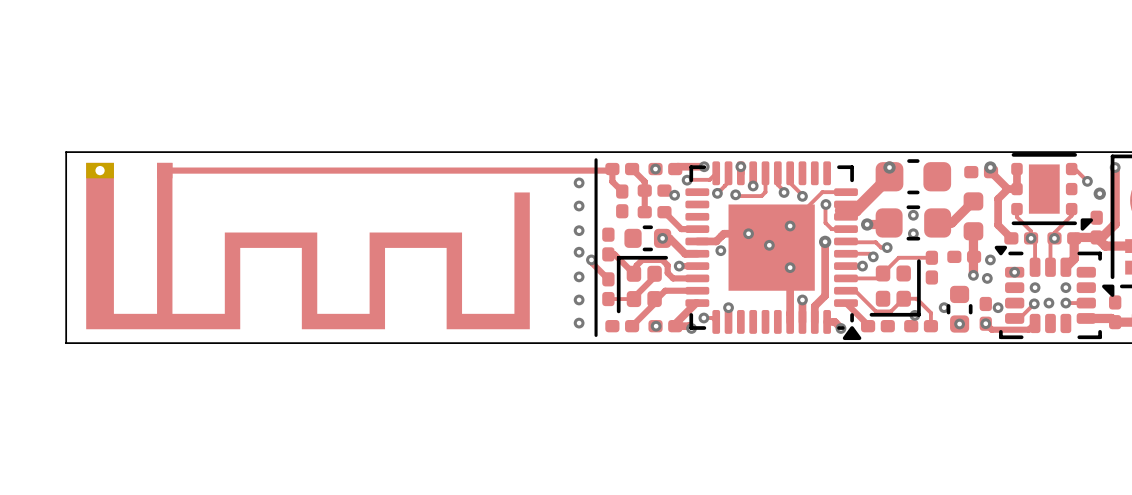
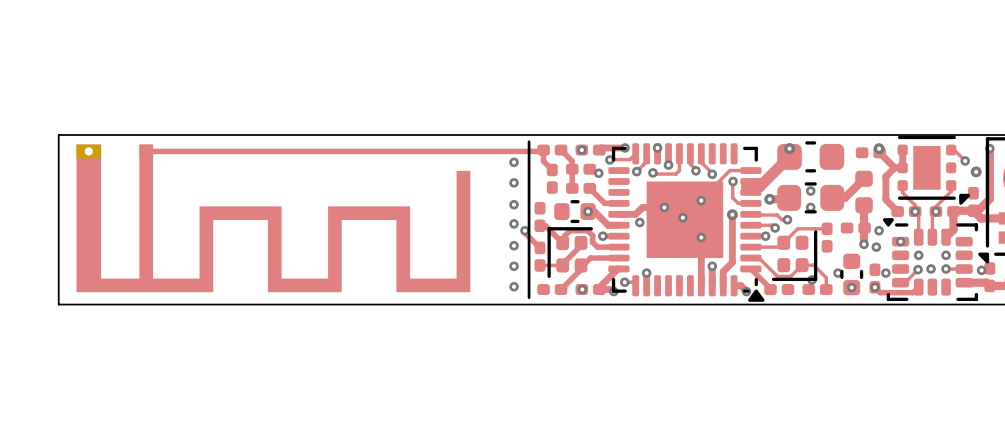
via: none -> (981, 270)

